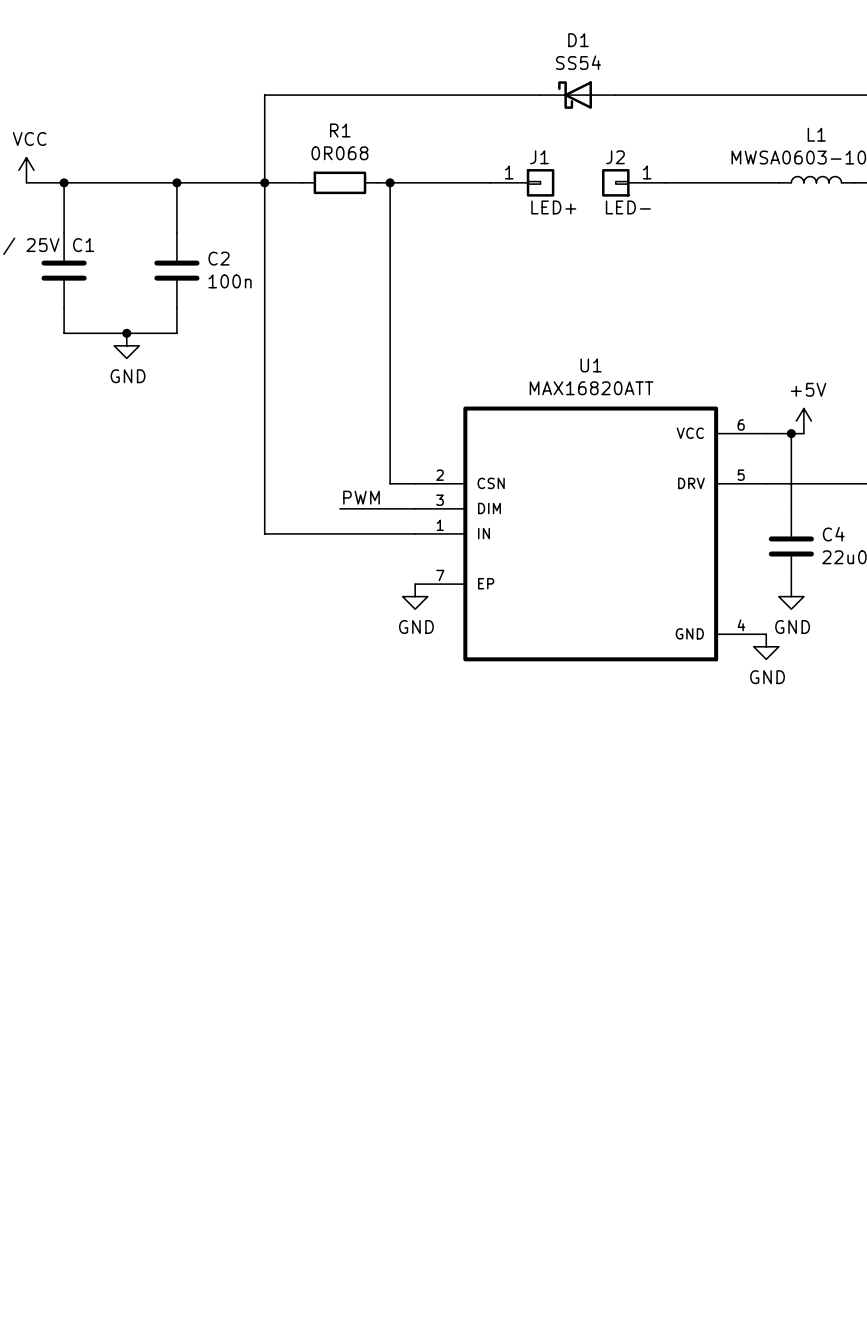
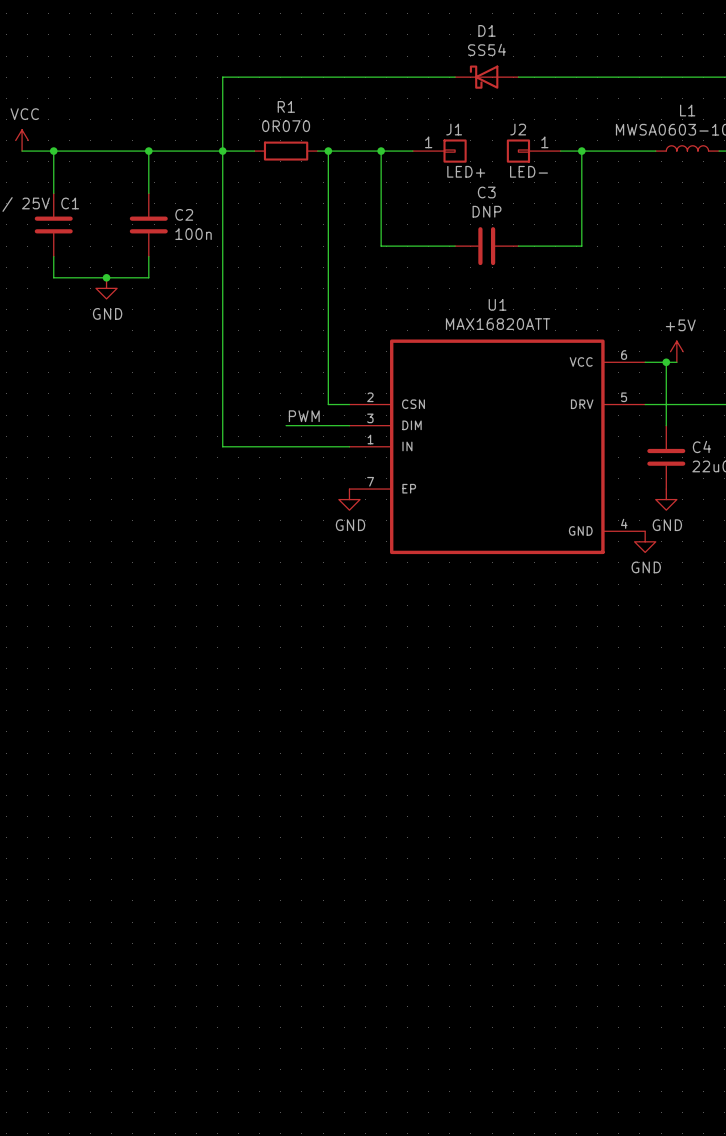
R1 value: 0R068 (339, 153) -> 0R070 (286, 126)
wire: none -> (381, 151) (381, 246) (455, 246)
junction: none -> (381, 151)
wire: none -> (581, 151) (581, 246) (518, 246)
junction: none -> (581, 151)
C3: none -> DNP (486, 246)

